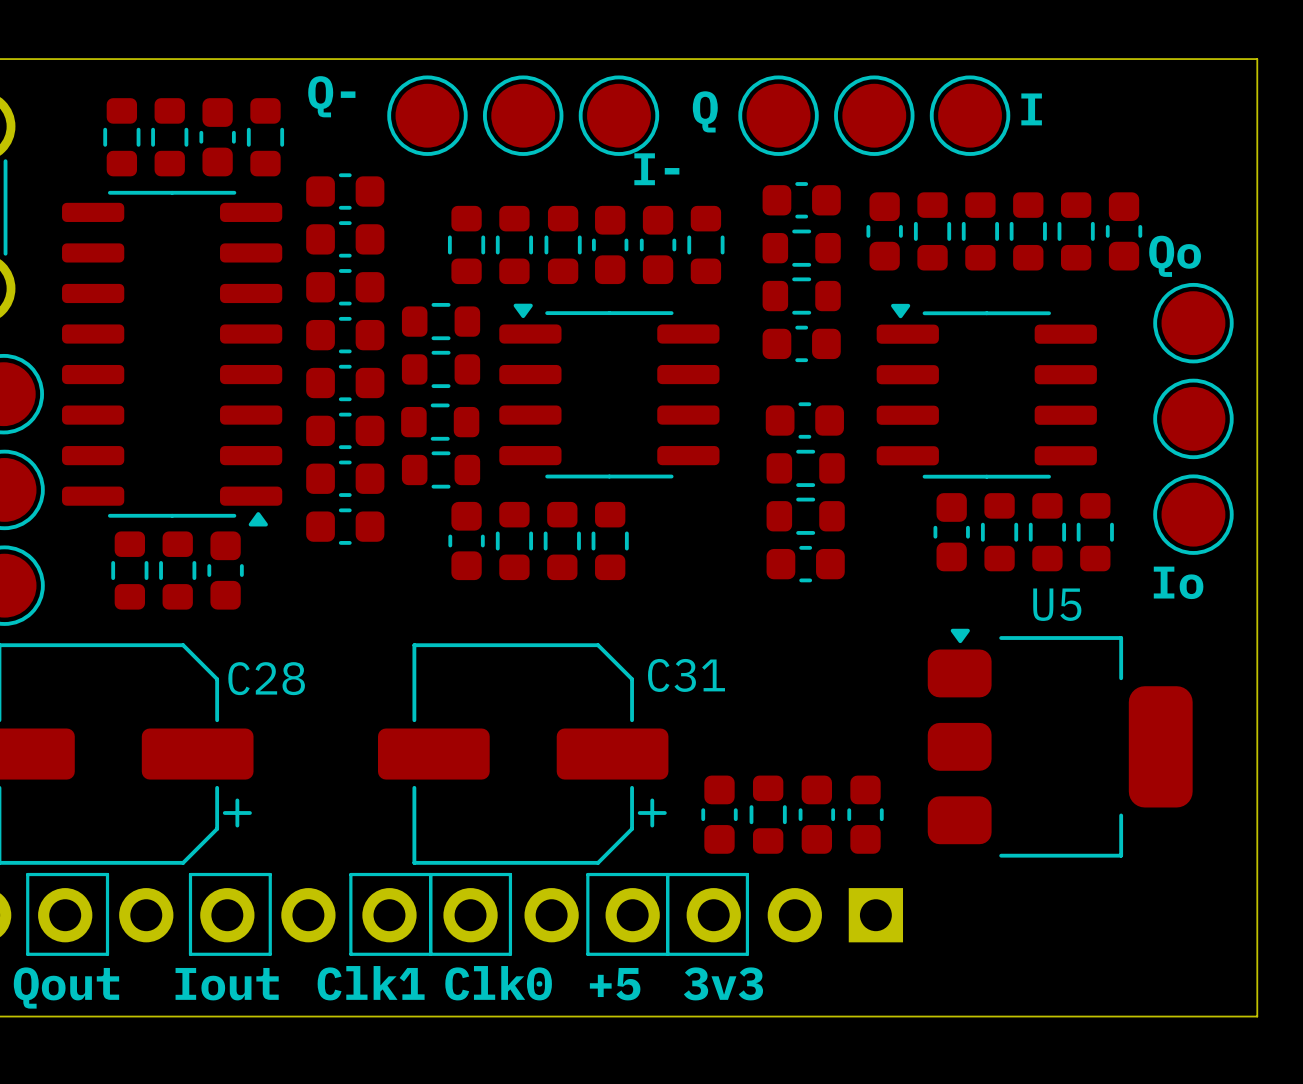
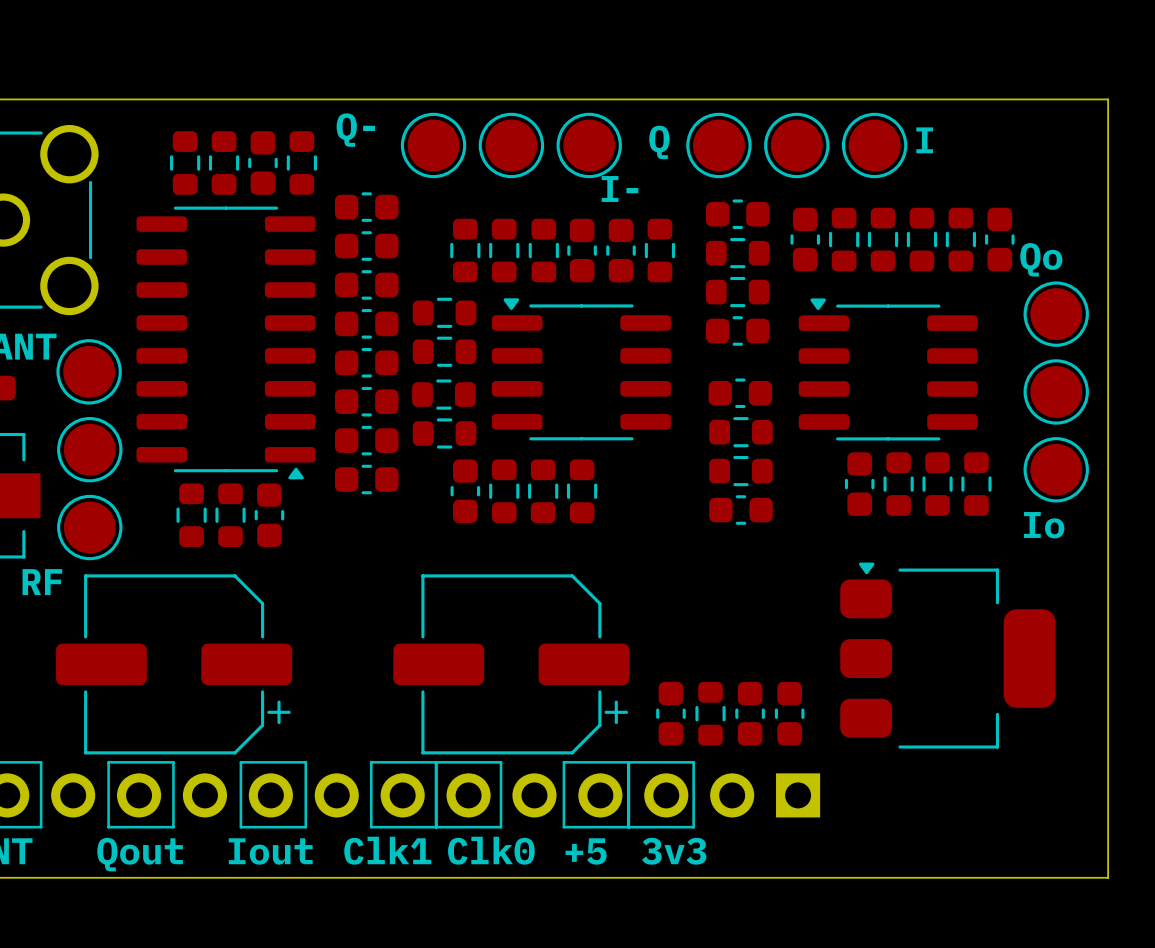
U5 name: U5 (1057, 604) -> none
C31 name: C31 (686, 675) -> none
C28 name: C28 (266, 678) -> none

